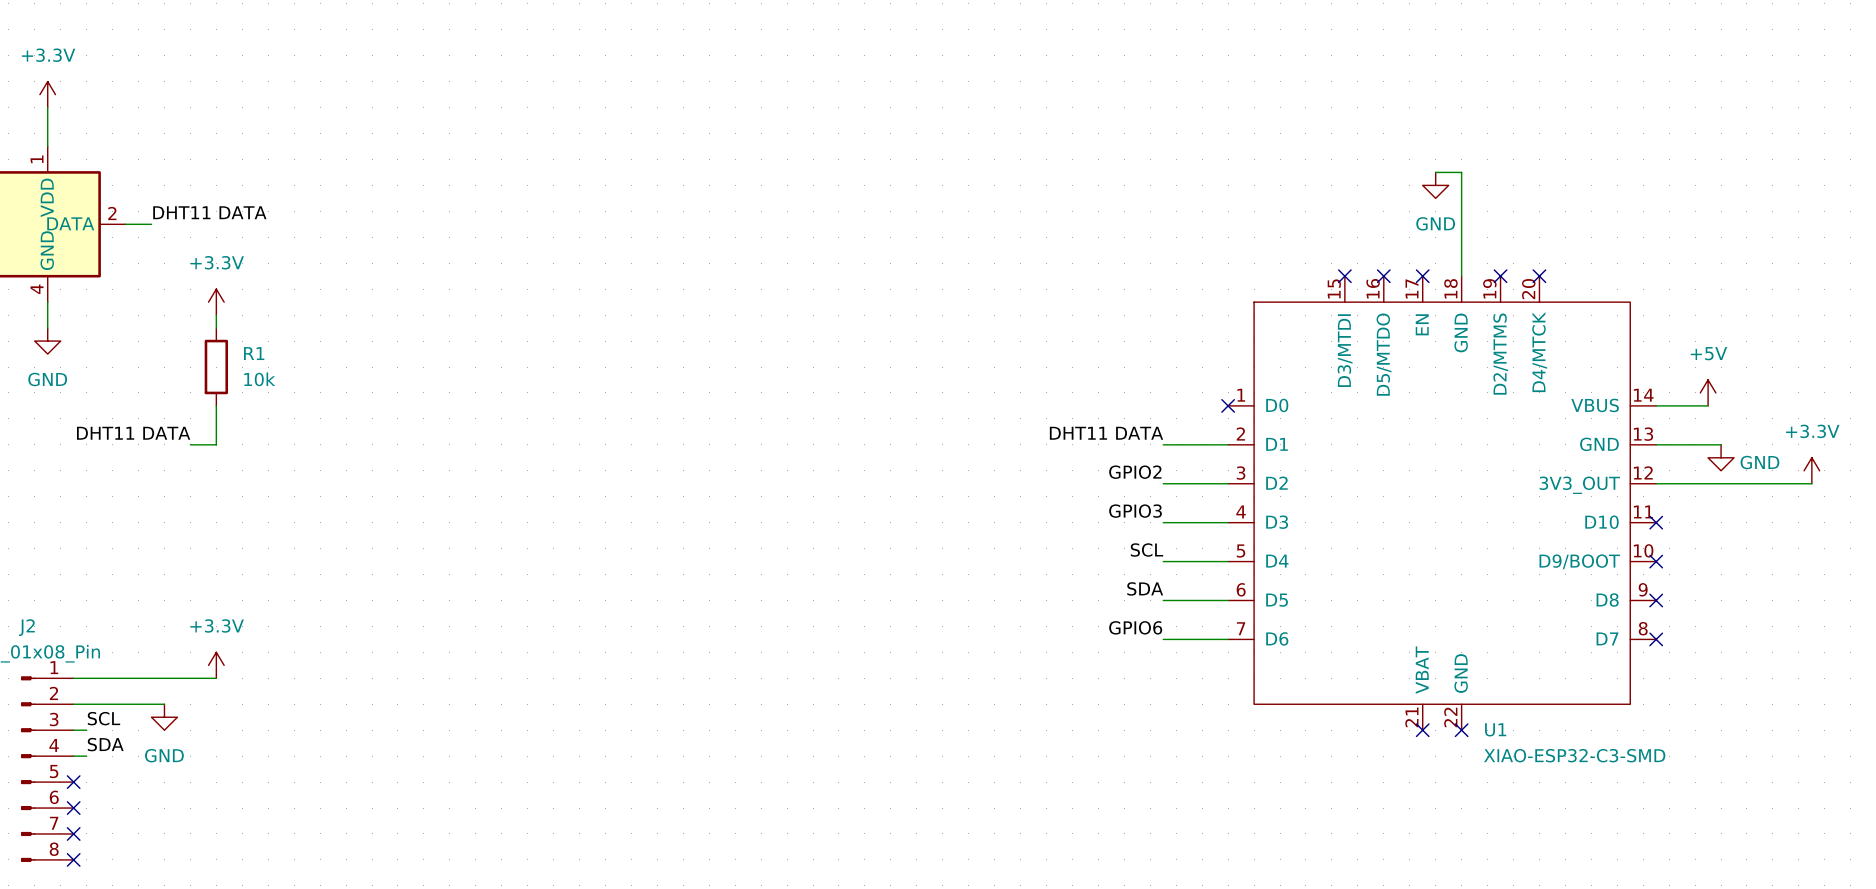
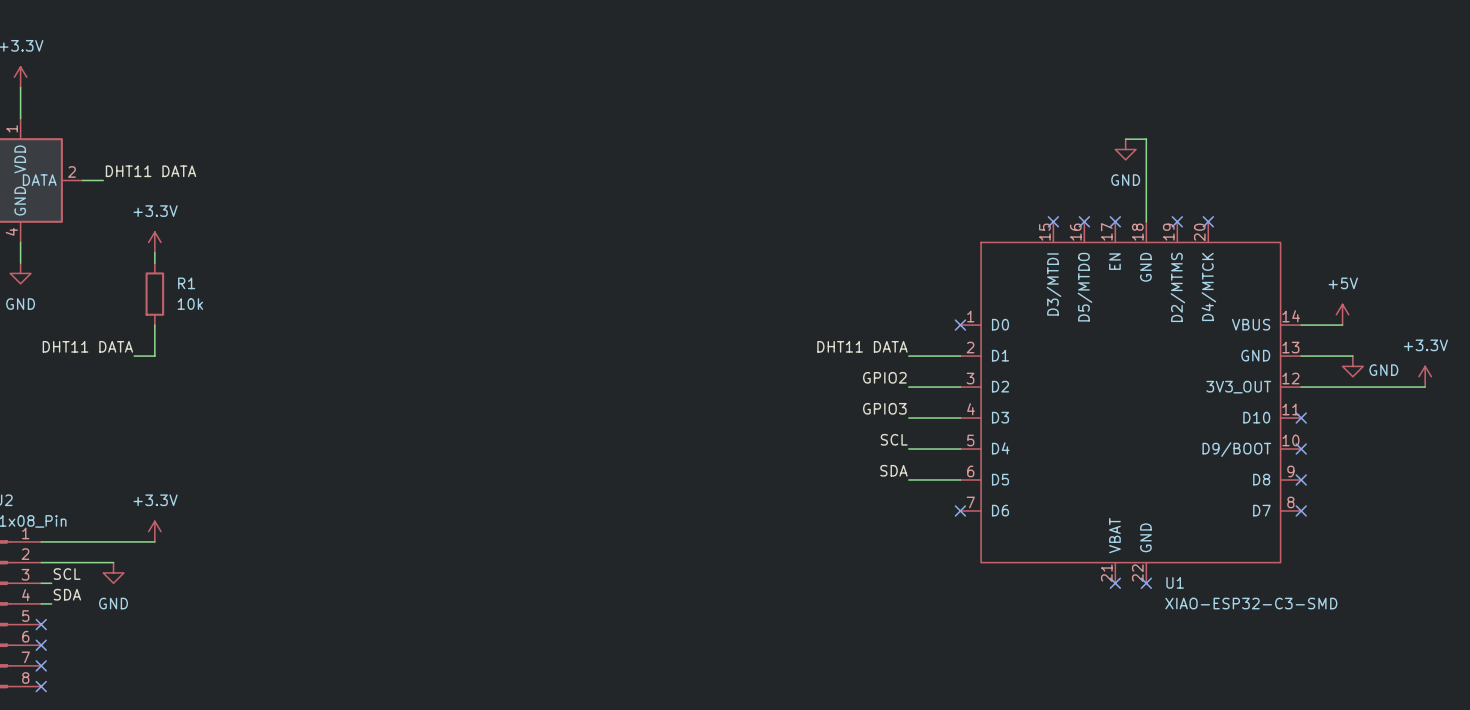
label: GPIO6 (1135, 627) -> none
wire: (1163, 639) (1228, 639) -> none
no-connect mark: none -> (960, 510)

